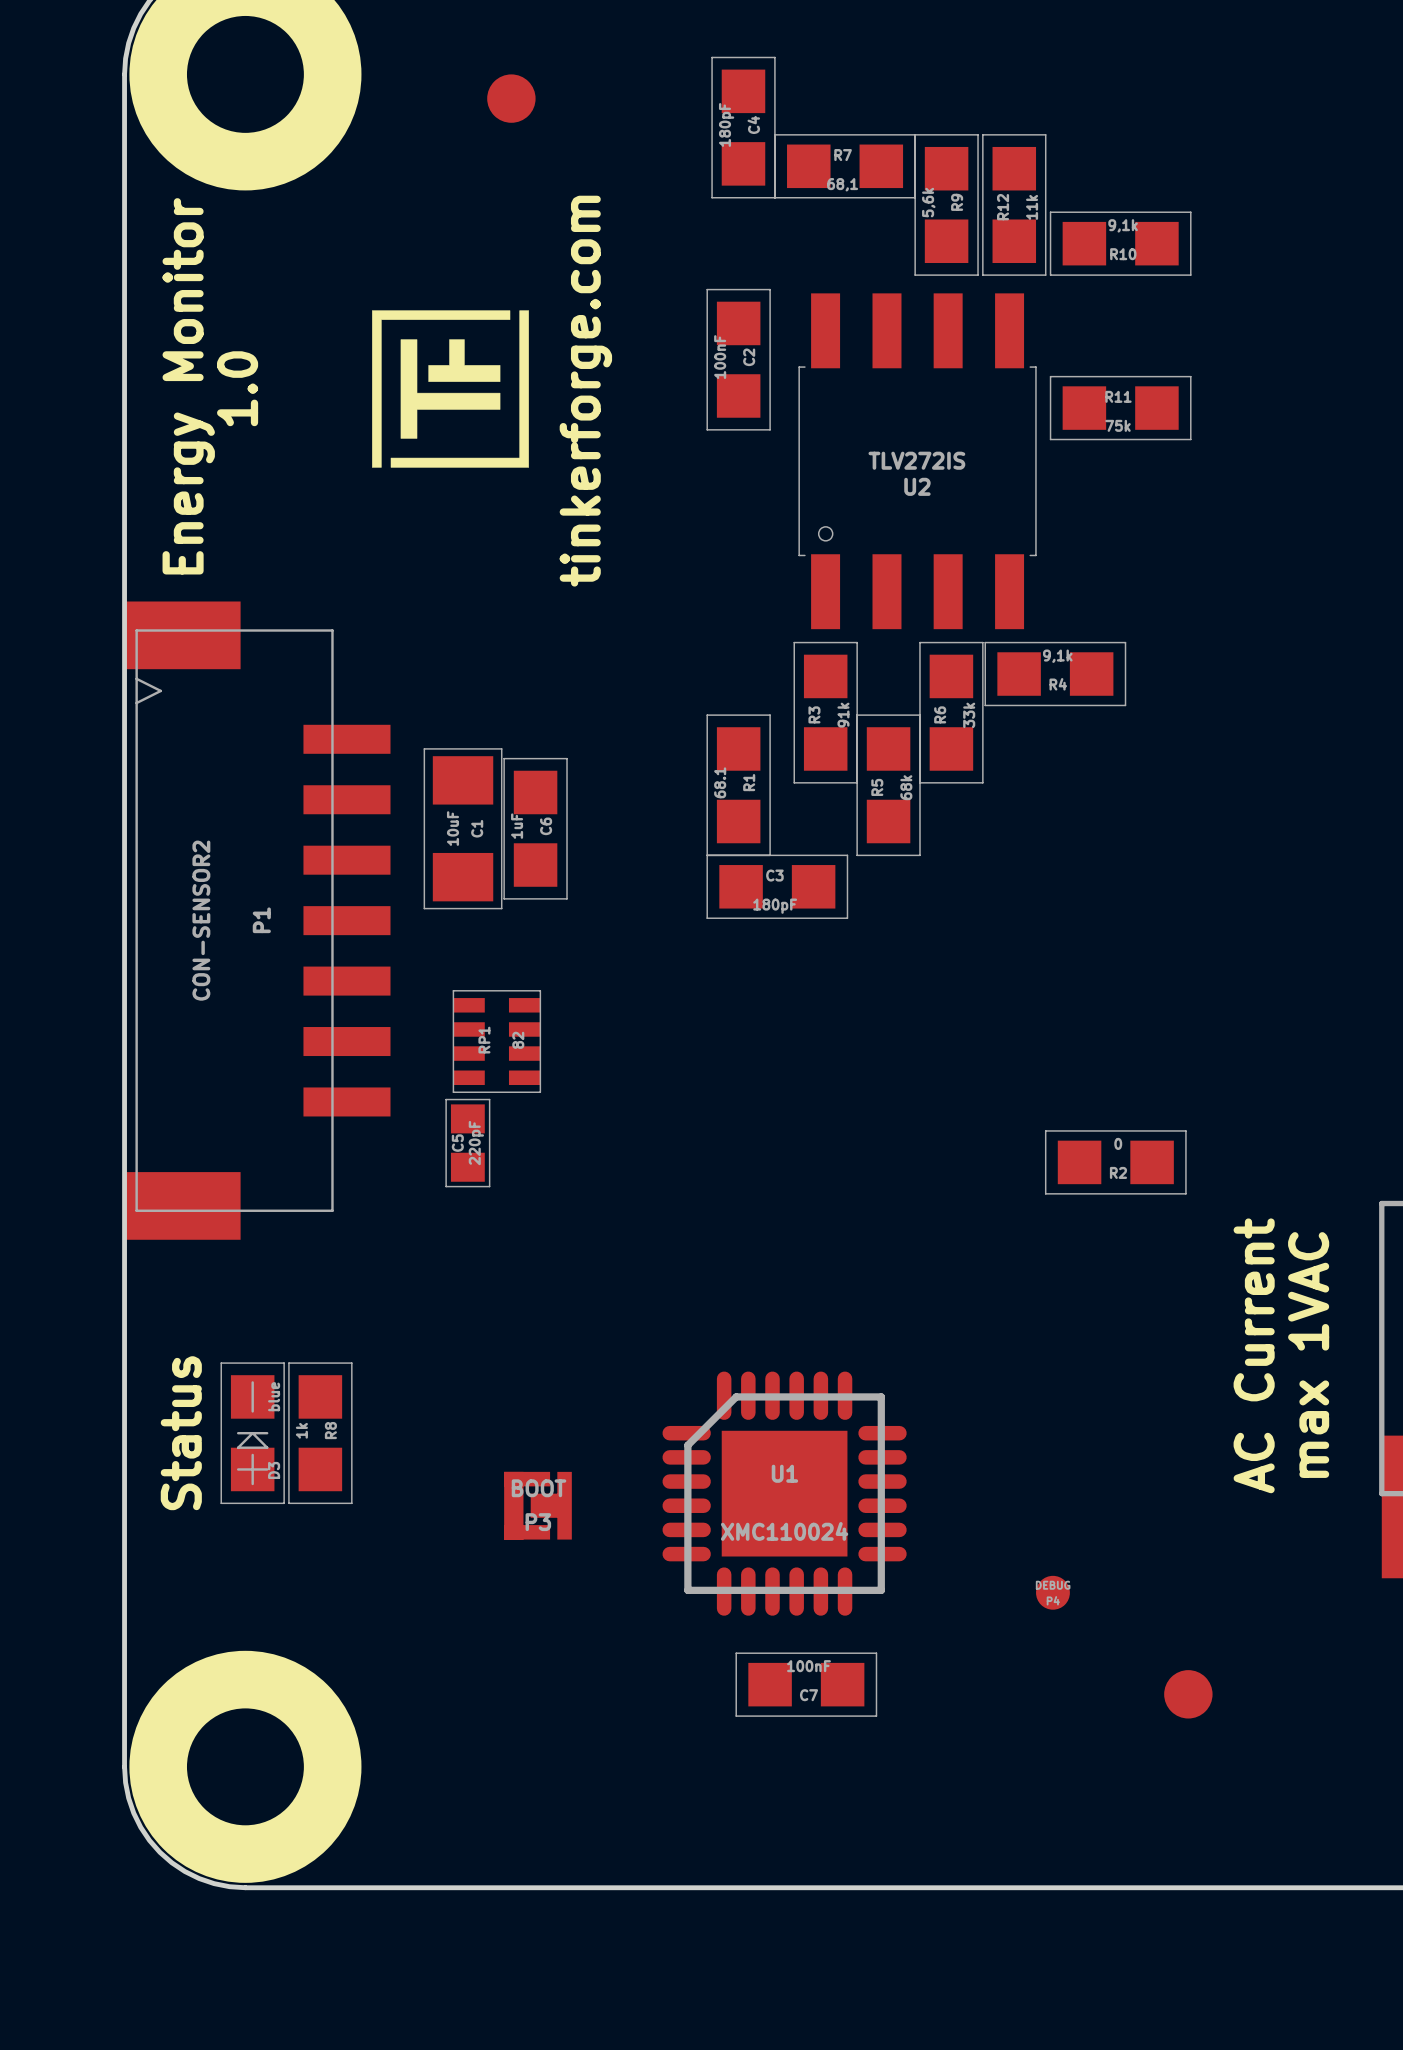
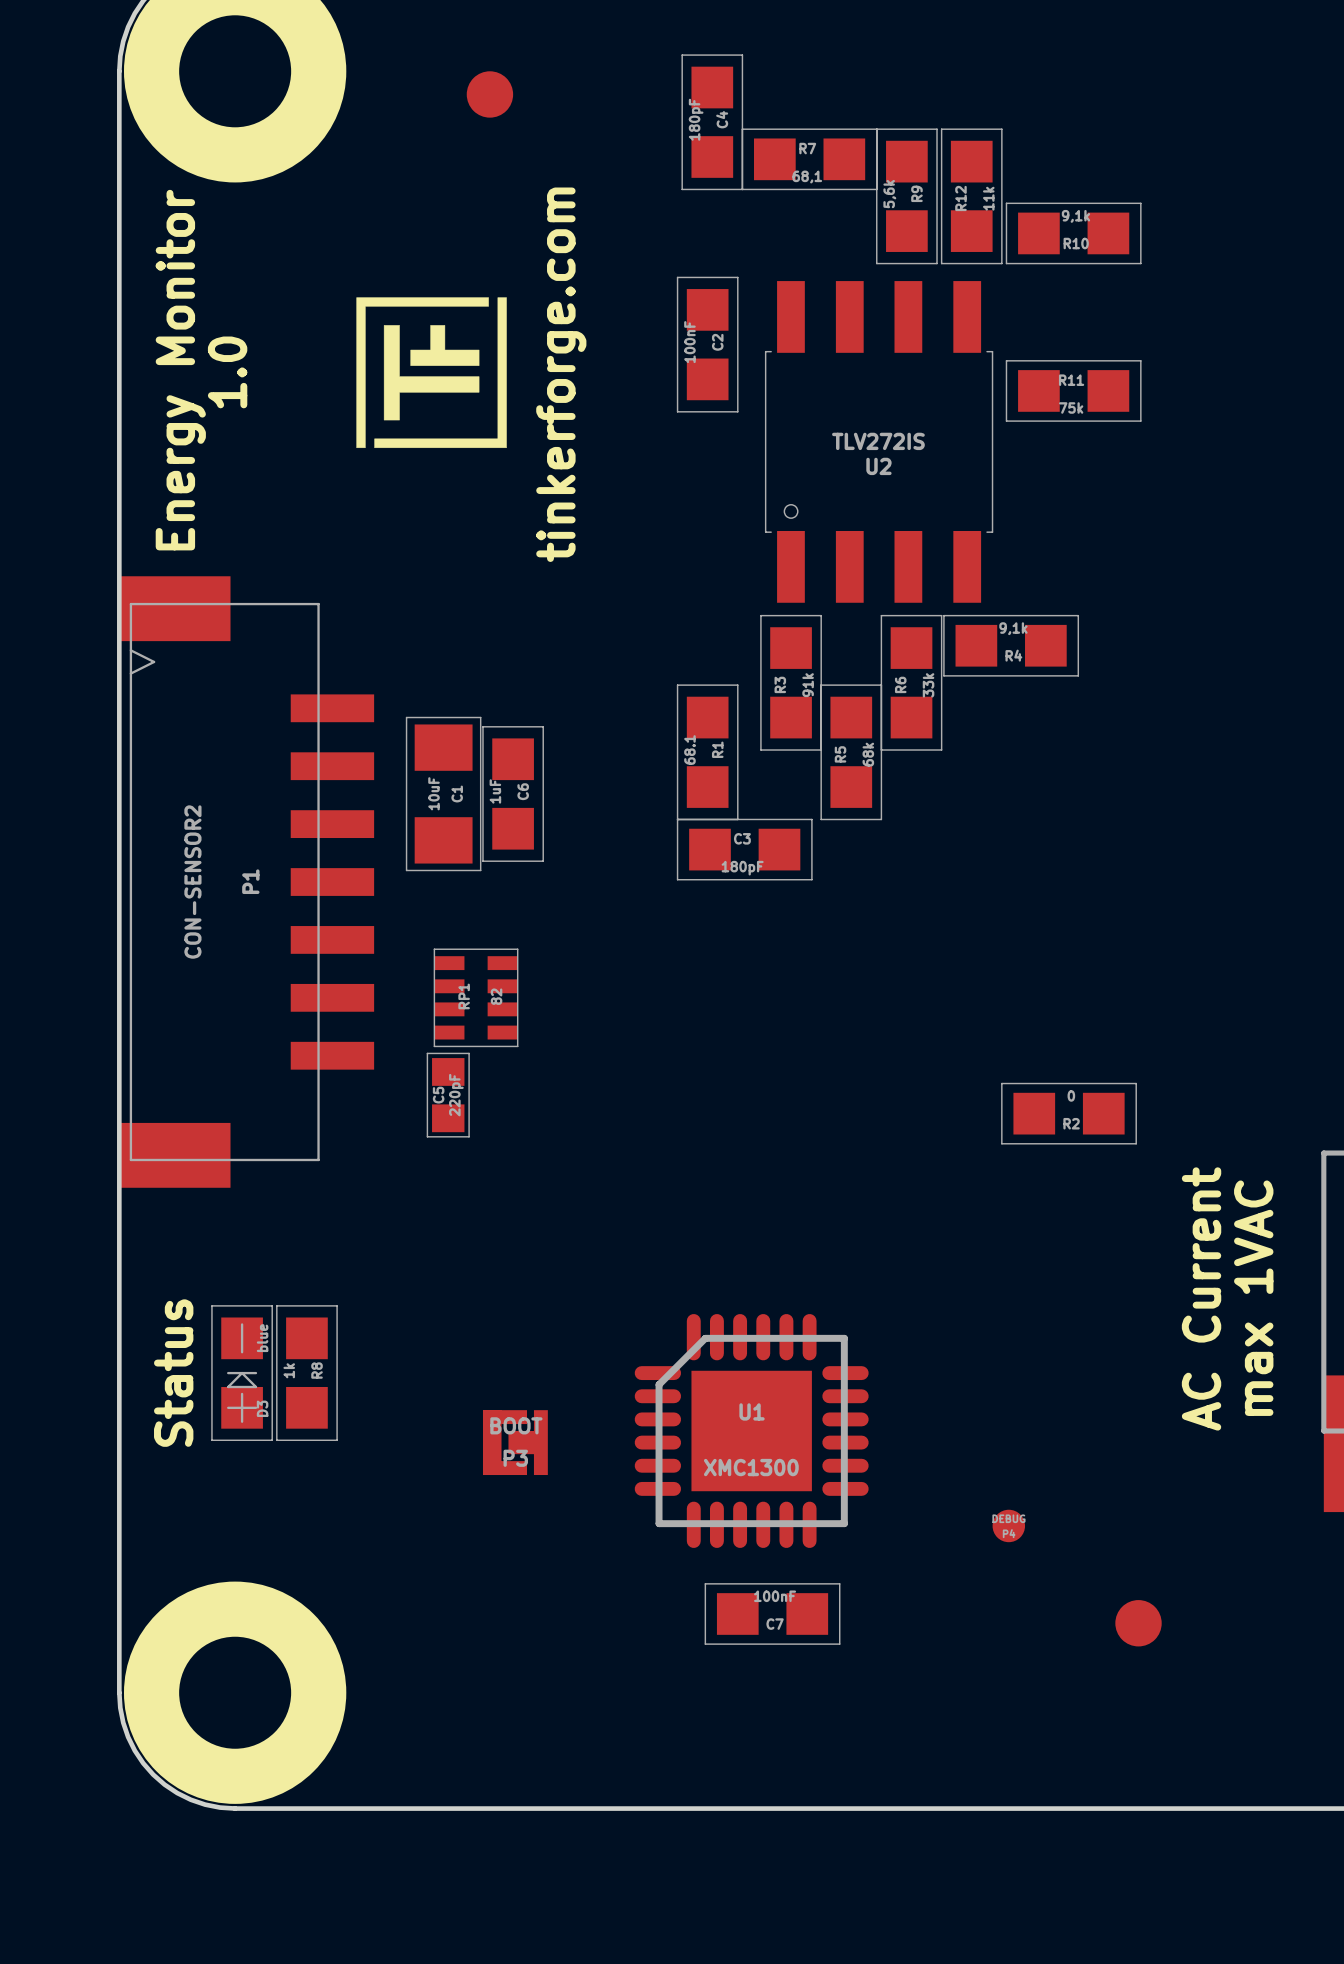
U1 value: XMC110024 (784, 1531) -> XMC1300 (751, 1467)

